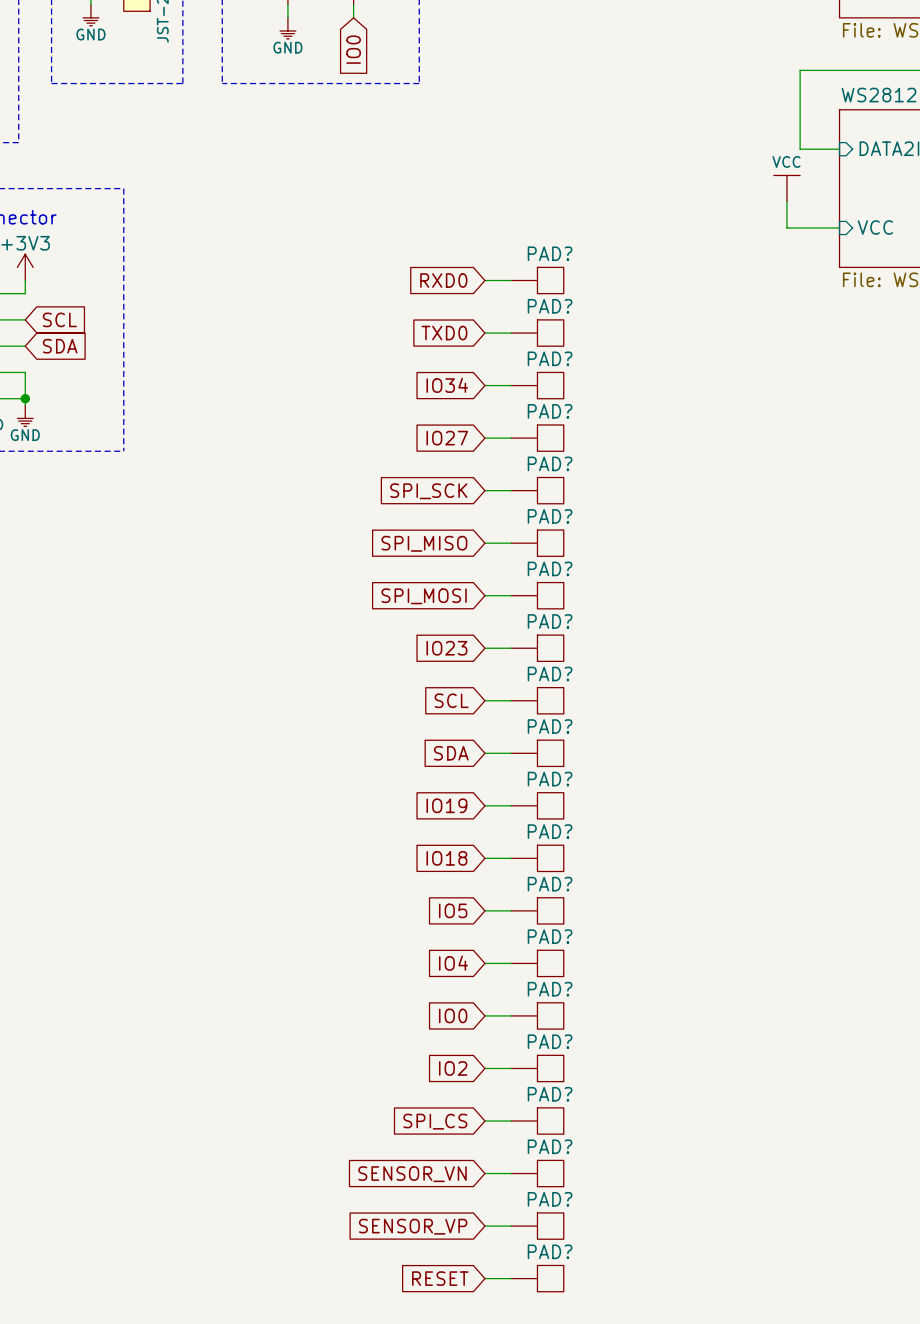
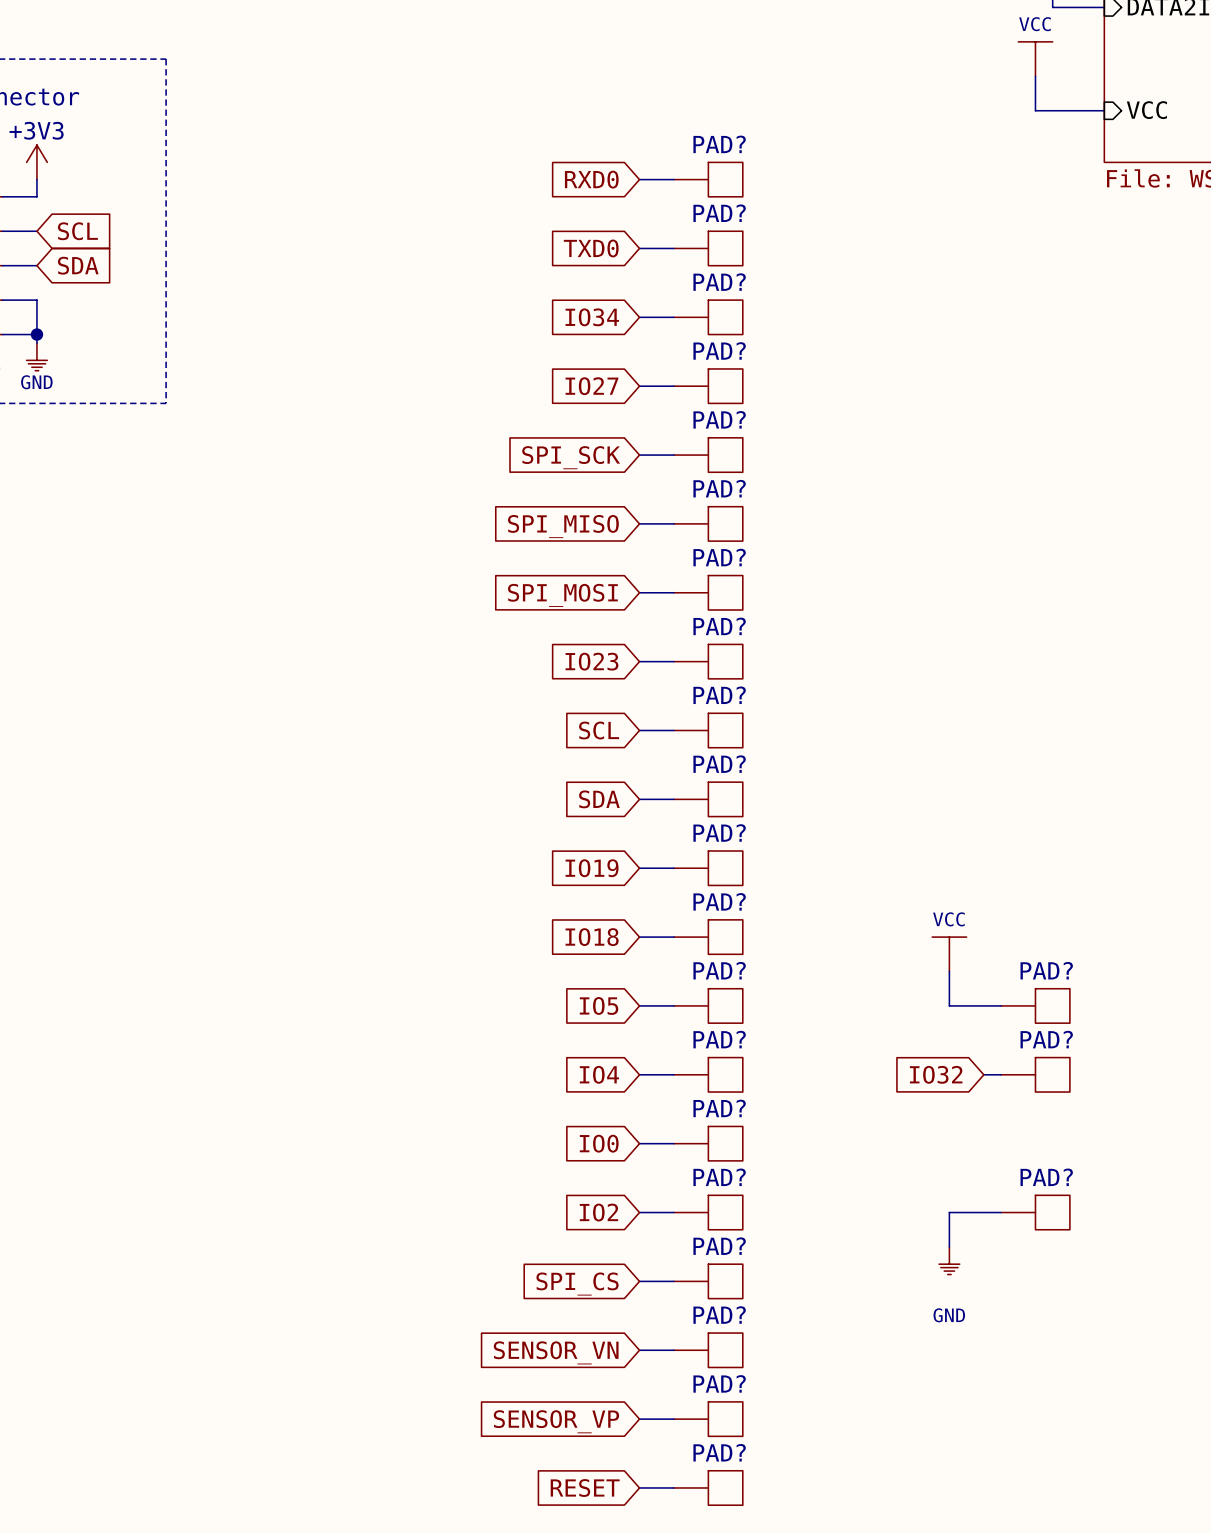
power symbol: none -> VCC (949, 954)
wire: none -> (949, 971) (949, 1005) (1001, 1005)
PAD?: none -> (1035, 1005)
global label: none -> IO32 (936, 1074)
wire: none -> (983, 1074) (1001, 1074)
PAD?: none -> (1035, 1074)
wire: none -> (1001, 1212) (949, 1212) (949, 1246)
PAD?: none -> (1035, 1212)
power symbol: none -> GND (949, 1260)

